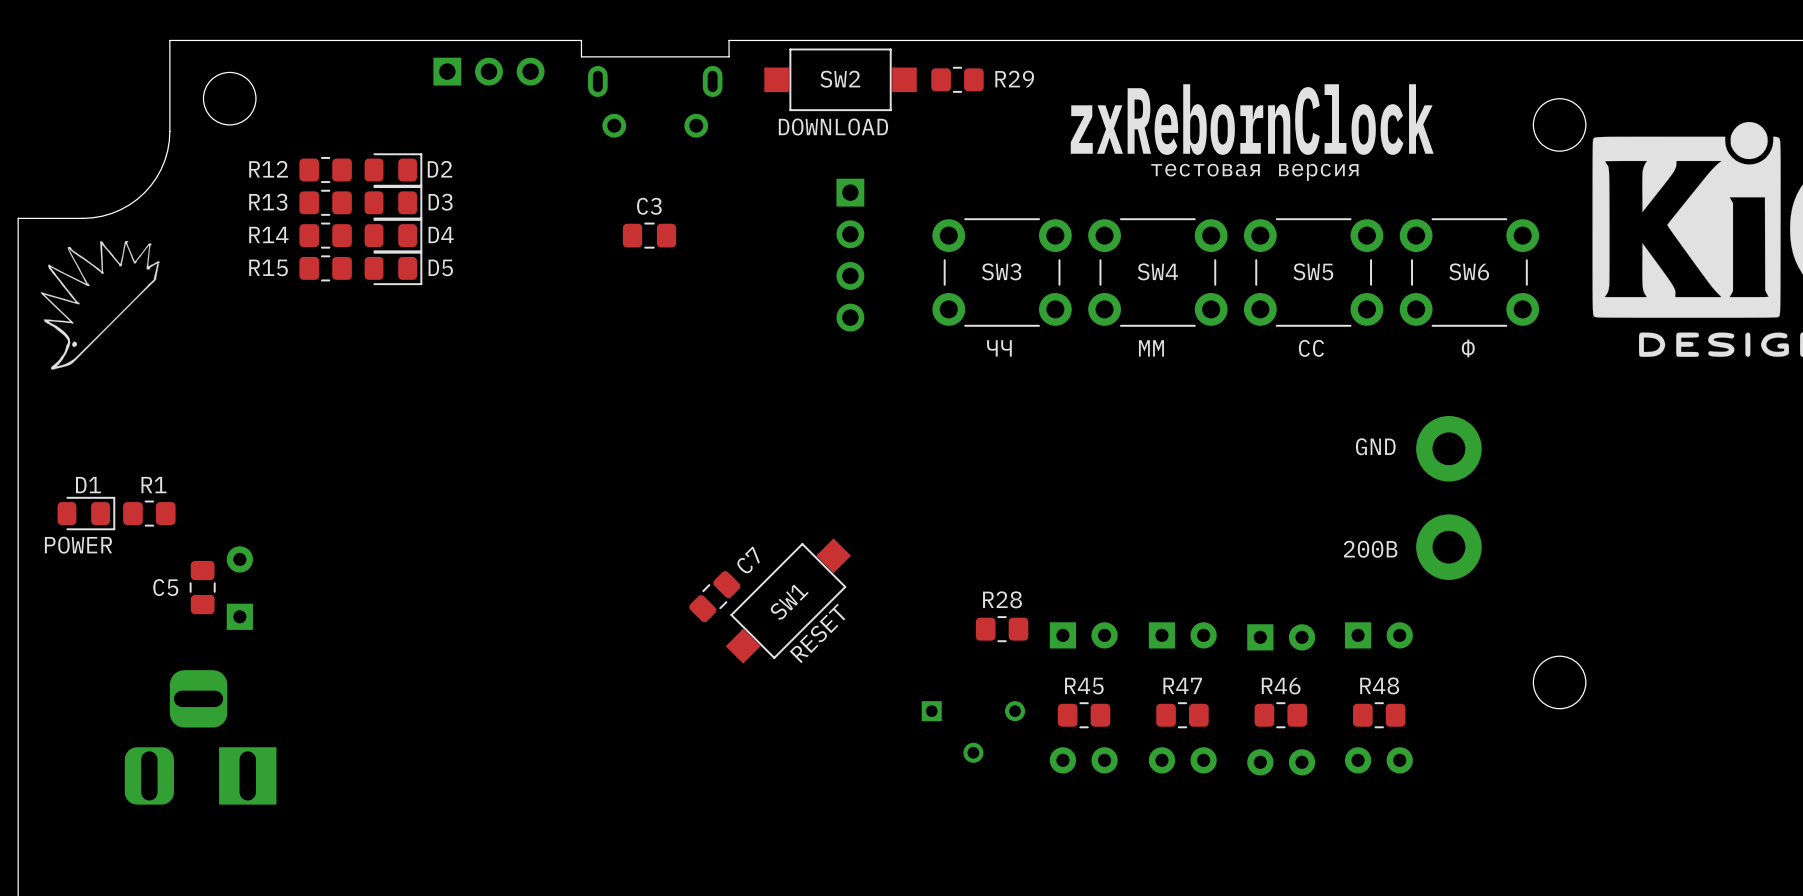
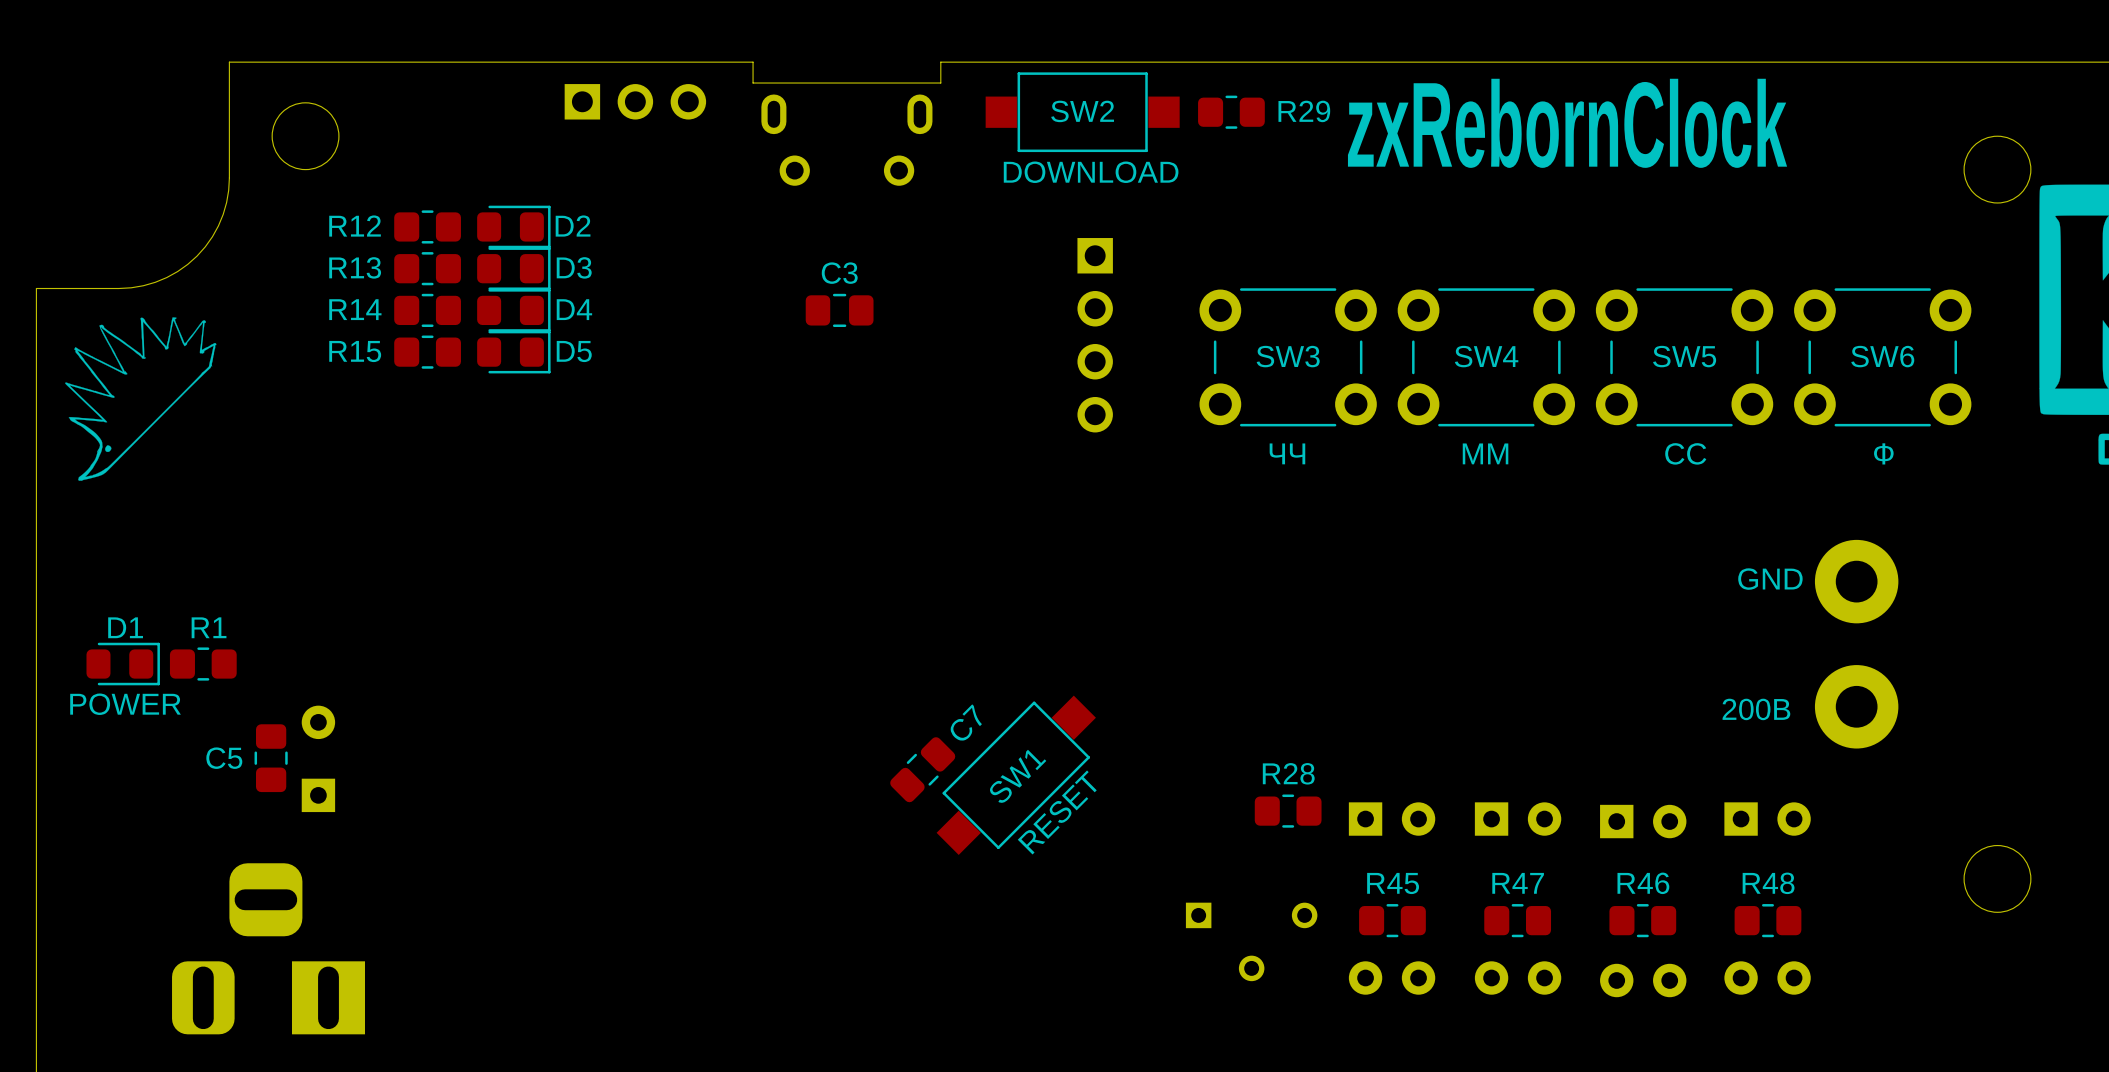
text position: zxRebornClock (1252, 119) -> zxRebornClock (1567, 123)
text: тестовая версия (1254, 172) -> none

